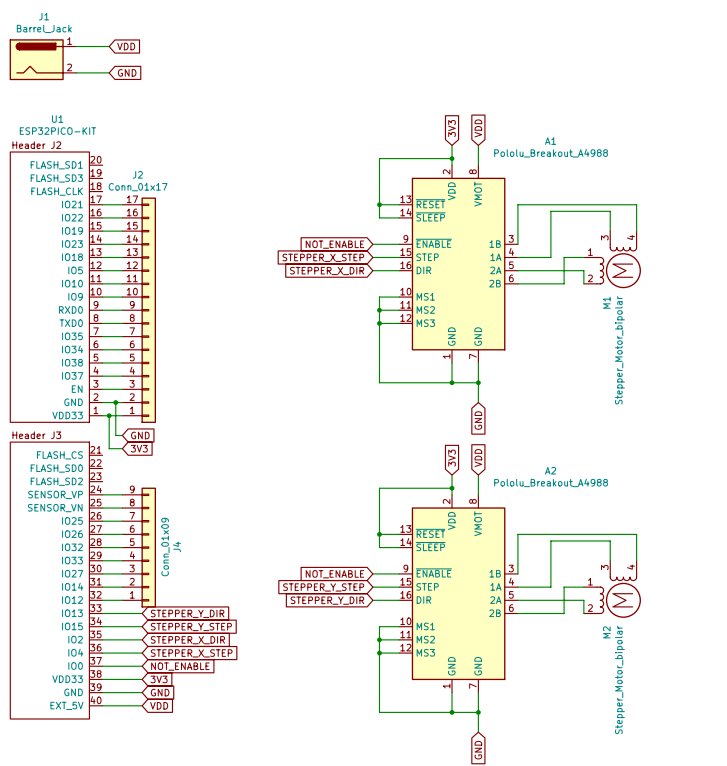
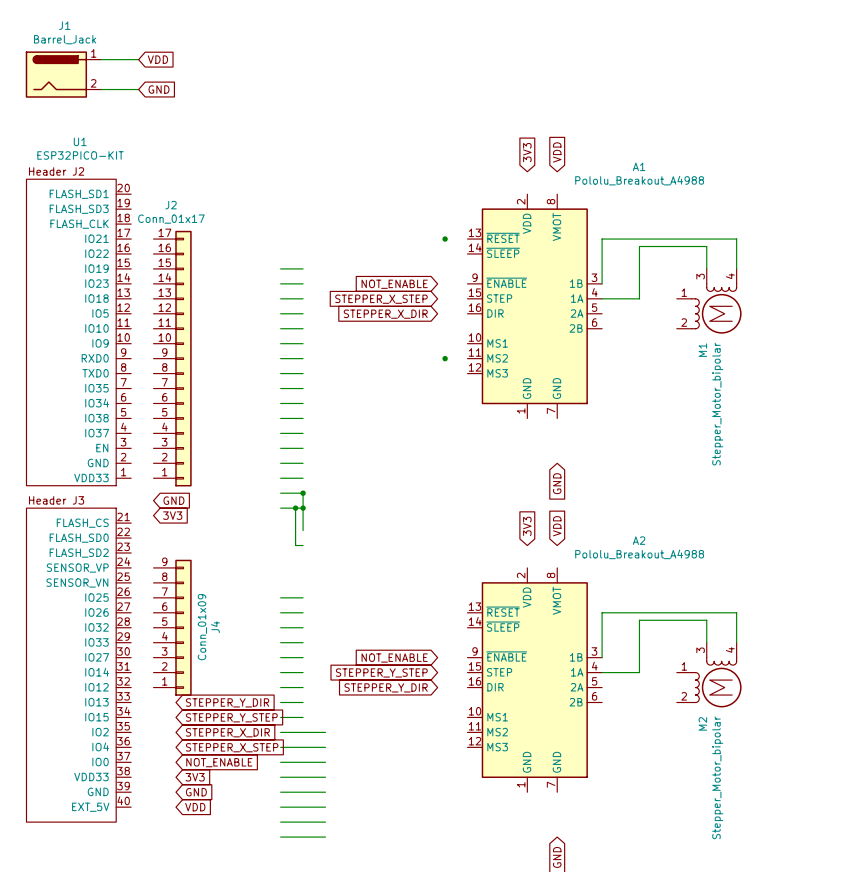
wire: (452, 145) (452, 165) -> none
wire: (478, 145) (478, 165) -> none
wire: (452, 158) (379, 158) (379, 217) (399, 217) -> none
junction: (452, 158) -> none
wire: (102, 204) (122, 204) -> none
wire: (379, 204) (399, 204) -> none
wire: (102, 217) (122, 217) -> none
wire: (102, 231) (122, 231) -> none
wire: none -> (280, 268) (303, 268)
wire: (102, 244) (122, 244) -> none
wire: none -> (280, 283) (303, 283)
wire: (372, 244) (399, 244) -> none
wire: (102, 257) (122, 257) -> none
wire: none -> (280, 298) (303, 298)
wire: (372, 257) (399, 257) -> none
wire: (583, 257) (564, 257) (564, 283) (517, 283) -> none
wire: (102, 270) (122, 270) -> none
wire: none -> (280, 313) (303, 313)
wire: (372, 270) (399, 270) -> none
wire: (517, 270) (583, 270) (583, 283) -> none
wire: (102, 283) (122, 283) -> none
wire: none -> (280, 328) (303, 328)
wire: (102, 297) (122, 297) -> none
wire: none -> (280, 343) (303, 343)
wire: (399, 297) (379, 297) (379, 382) (478, 382) -> none
wire: (102, 310) (122, 310) -> none
wire: none -> (280, 358) (303, 358)
wire: (379, 310) (399, 310) -> none
wire: (102, 323) (122, 323) -> none
wire: none -> (280, 373) (303, 373)
wire: (379, 323) (399, 323) -> none
junction: (379, 323) -> none
wire: (102, 336) (122, 336) -> none
wire: none -> (280, 388) (303, 388)
wire: (102, 349) (122, 349) -> none
wire: none -> (280, 403) (303, 403)
wire: (102, 362) (122, 362) -> none
wire: none -> (280, 418) (303, 418)
wire: (452, 362) (452, 382) -> none
wire: (478, 362) (478, 402) -> none
wire: (102, 376) (122, 376) -> none
wire: none -> (280, 433) (303, 433)
junction: (452, 382) -> none
junction: (478, 382) -> none
wire: (102, 389) (122, 389) -> none
wire: none -> (280, 448) (303, 448)
wire: (102, 402) (122, 402) -> none
wire: (115, 402) (115, 435) (122, 435) -> none
junction: (115, 402) -> none
wire: none -> (280, 463) (303, 463)
wire: (102, 415) (122, 415) -> none
wire: (109, 415) (109, 448) (122, 448) -> none
junction: (109, 415) -> none
wire: none -> (280, 478) (303, 478)
wire: none -> (280, 493) (303, 493) (303, 530)
junction: none -> (303, 493)
wire: none -> (280, 508) (303, 508)
wire: none -> (295, 508) (295, 545) (303, 545)
junction: none -> (295, 508)
junction: none -> (303, 508)
wire: (452, 475) (452, 494) -> none
wire: (478, 475) (478, 494) -> none
wire: (452, 488) (379, 488) (379, 547) (399, 547) -> none
junction: (452, 488) -> none
wire: (102, 494) (122, 494) -> none
wire: (102, 508) (122, 508) -> none
wire: (102, 521) (122, 521) -> none
wire: none -> (280, 597) (303, 597)
wire: (102, 534) (122, 534) -> none
wire: none -> (280, 612) (303, 612)
wire: (379, 534) (399, 534) -> none
junction: (379, 534) -> none
wire: (102, 547) (122, 547) -> none
wire: none -> (280, 627) (303, 627)
wire: (102, 560) (122, 560) -> none
wire: none -> (280, 642) (303, 642)
wire: (102, 573) (122, 573) -> none
wire: none -> (280, 657) (303, 657)
wire: (372, 573) (399, 573) -> none
wire: (102, 587) (122, 587) -> none
wire: none -> (280, 672) (303, 672)
wire: (372, 587) (399, 587) -> none
wire: (583, 587) (564, 587) (564, 613) (517, 613) -> none
wire: (102, 600) (122, 600) -> none
wire: none -> (280, 687) (303, 687)
wire: (372, 600) (399, 600) -> none
wire: (517, 600) (583, 600) (583, 613) -> none
wire: (102, 613) (142, 613) -> none
wire: none -> (280, 702) (303, 702)
wire: (102, 626) (142, 626) -> none
wire: none -> (280, 717) (303, 717)
wire: (399, 626) (379, 626) (379, 712) (478, 712) -> none
wire: (102, 639) (142, 639) -> none
wire: none -> (280, 732) (325, 732)
wire: (379, 639) (399, 639) -> none
junction: (379, 639) -> none
wire: (102, 653) (142, 653) -> none
wire: none -> (280, 747) (325, 747)
wire: (379, 653) (399, 653) -> none
junction: (379, 653) -> none
wire: (102, 666) (142, 666) -> none
wire: none -> (280, 762) (325, 762)
wire: (102, 679) (142, 679) -> none
wire: none -> (280, 777) (325, 777)
wire: (102, 692) (142, 692) -> none
wire: none -> (280, 792) (325, 792)
wire: (452, 692) (452, 712) -> none
wire: (478, 692) (478, 732) -> none
wire: (102, 705) (142, 705) -> none
wire: none -> (280, 807) (325, 807)
junction: (452, 712) -> none
junction: (478, 712) -> none
wire: none -> (280, 822) (325, 822)
wire: none -> (280, 837) (325, 837)

